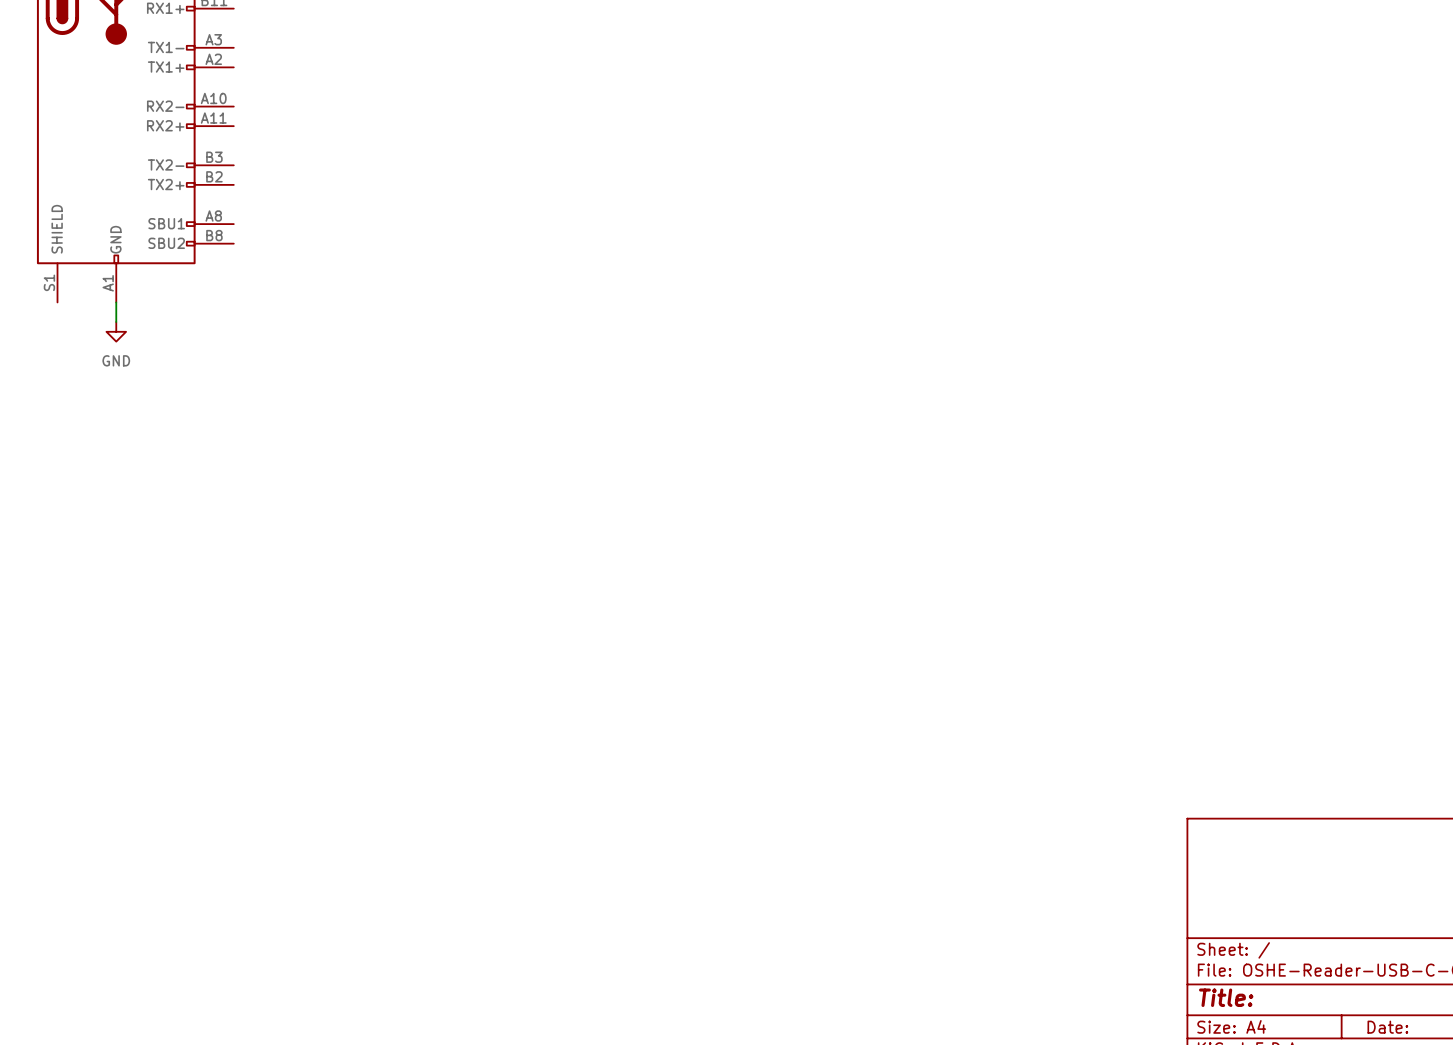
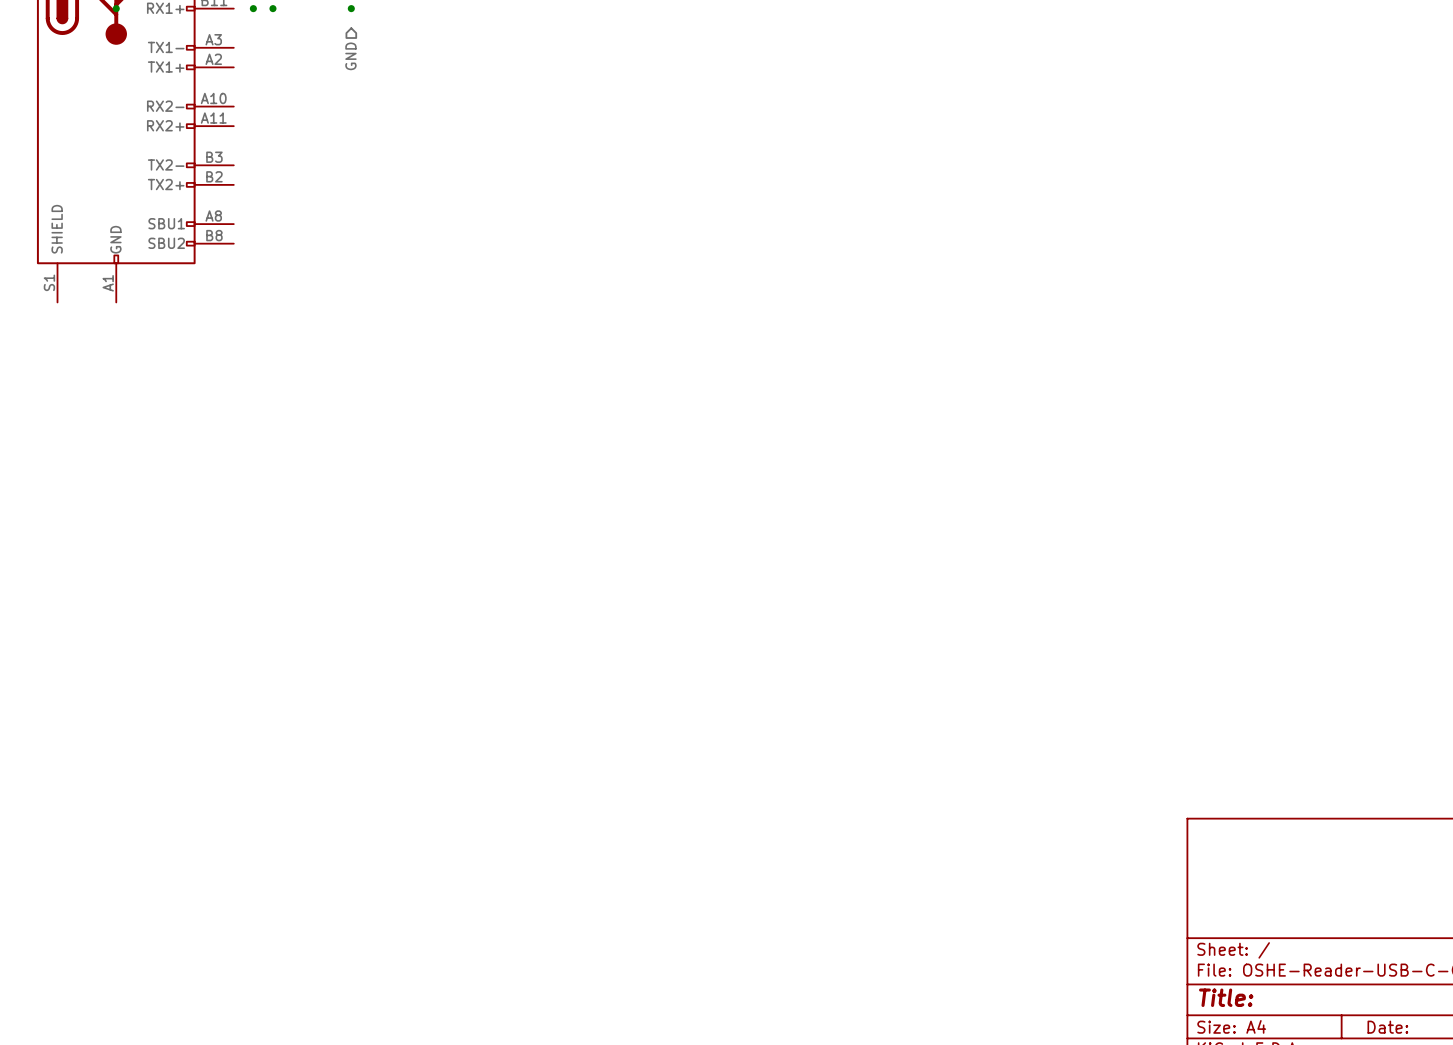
junction: none -> (116, 8)
junction: none -> (253, 8)
junction: none -> (272, 8)
junction: none -> (351, 8)
hierarchical label: none -> GND (350, 56)
wire: (116, 302) (116, 322) -> none
power symbol: GND (116, 331) -> none

